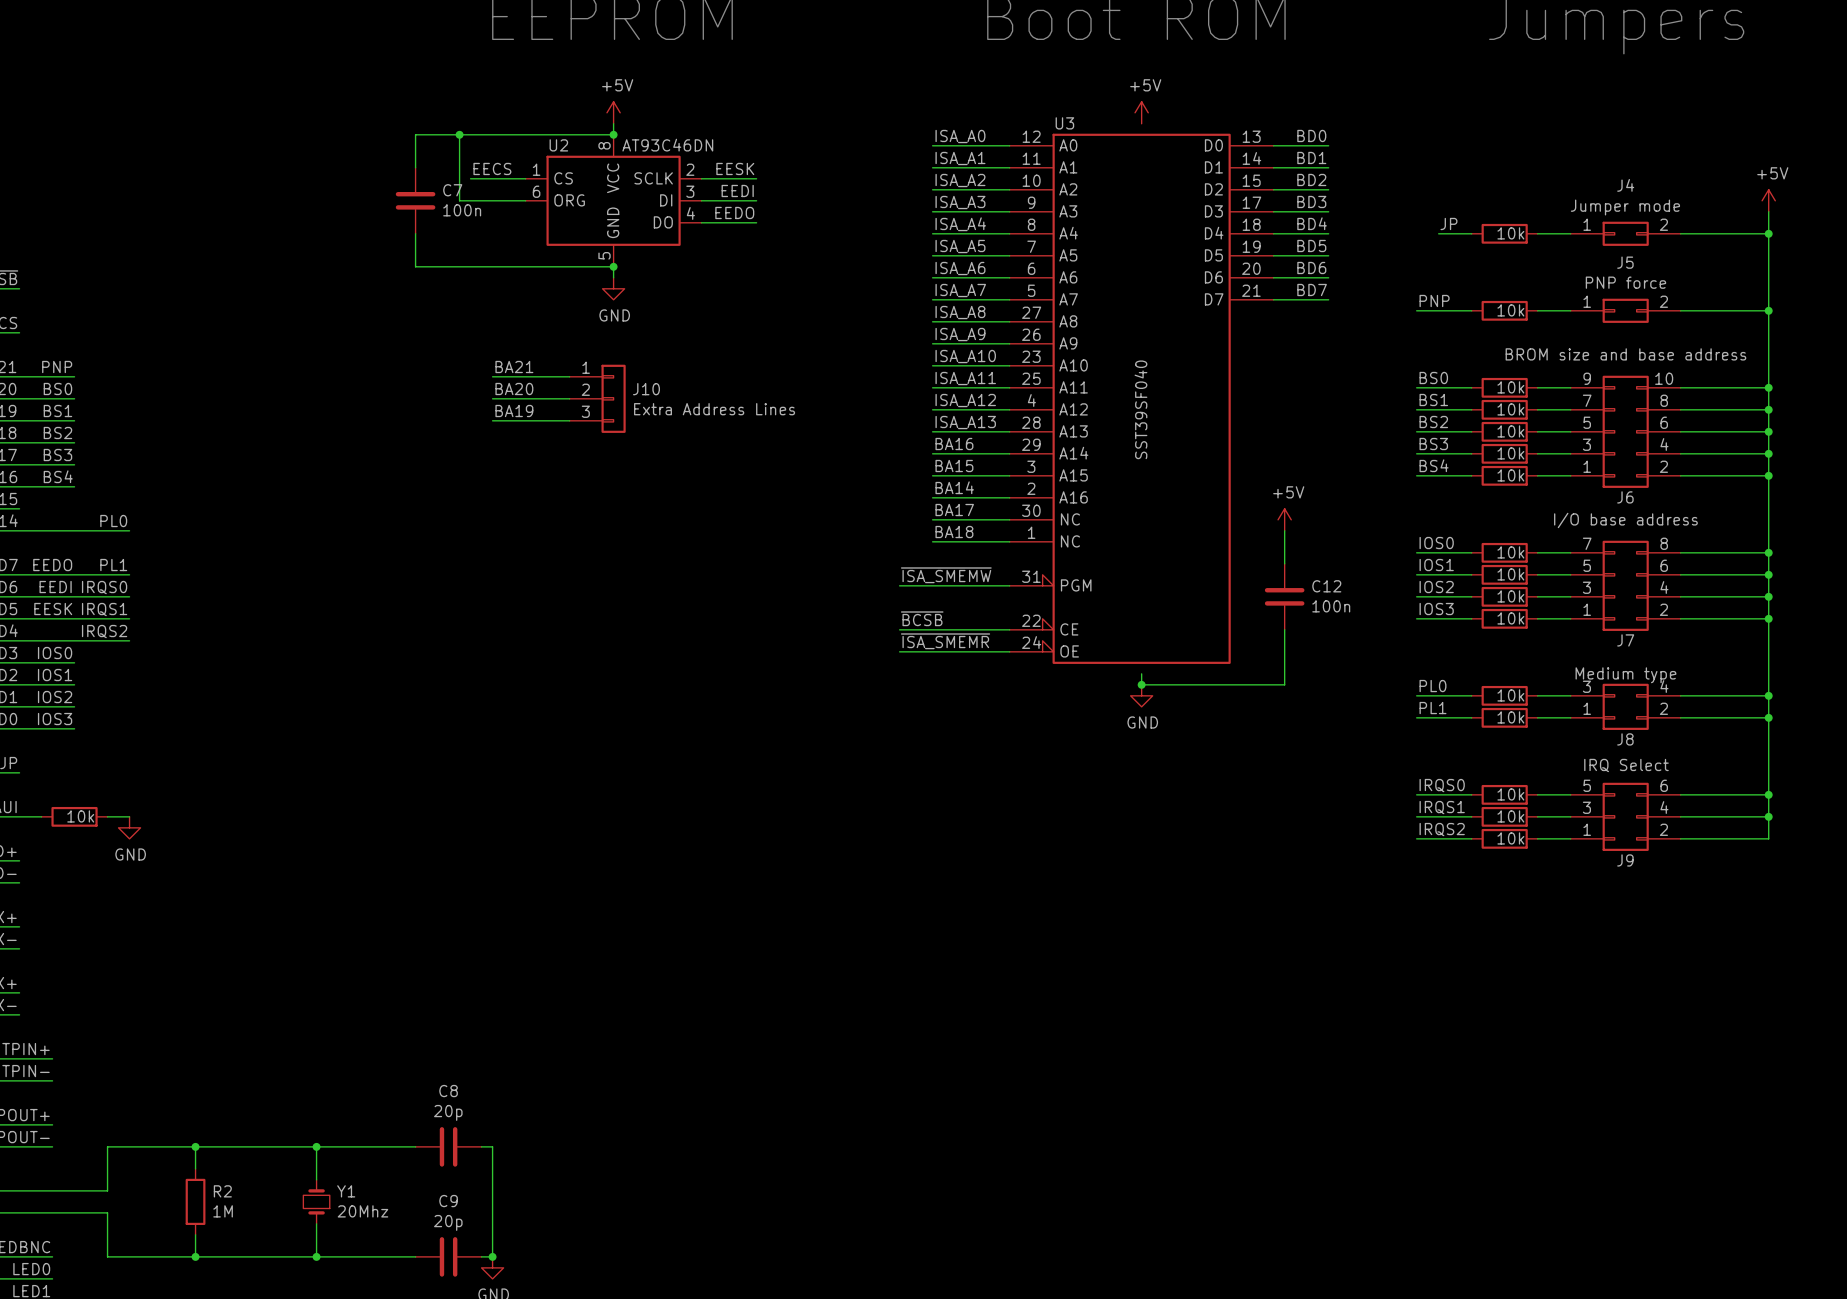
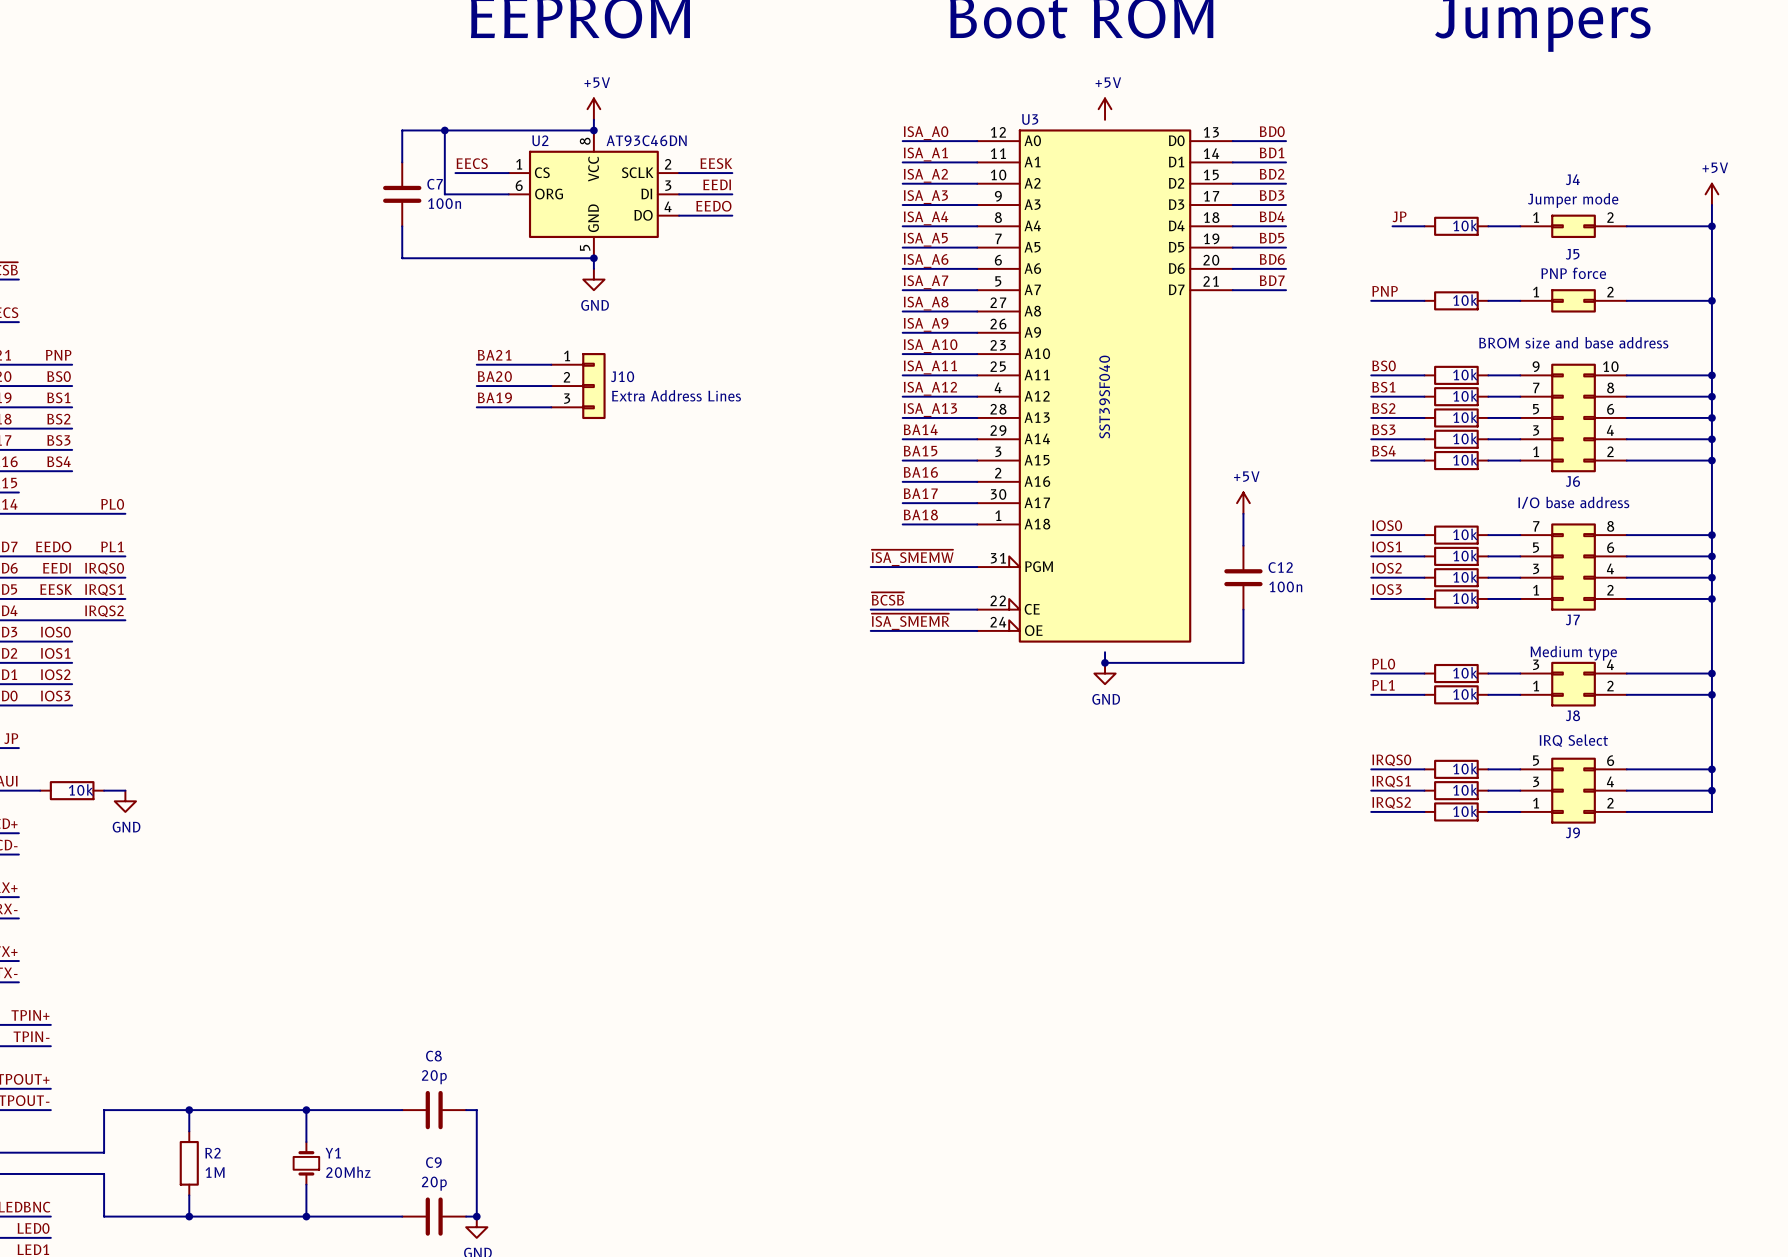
label: BA16 (954, 444) -> BA14 (920, 429)
label: BA14 (954, 487) -> BA16 (920, 472)
U3 pin name: NC (1070, 519) -> A17 (1037, 502)
U3 pin name: NC (1070, 541) -> A18 (1037, 524)

